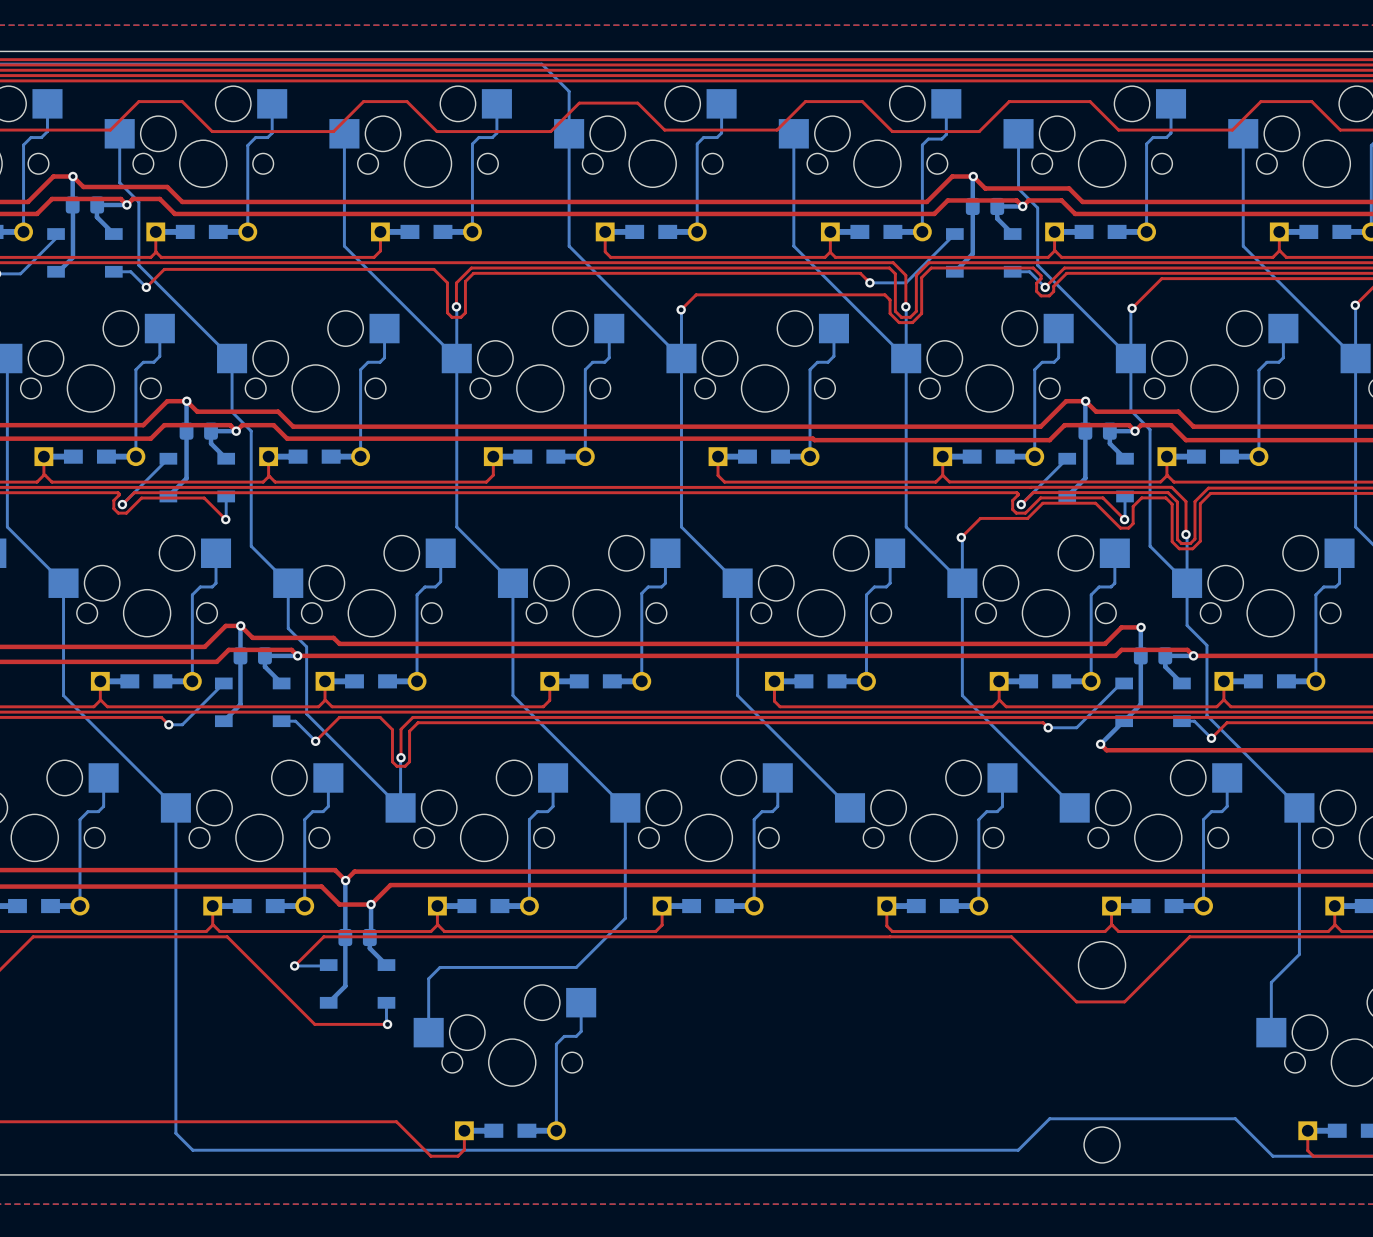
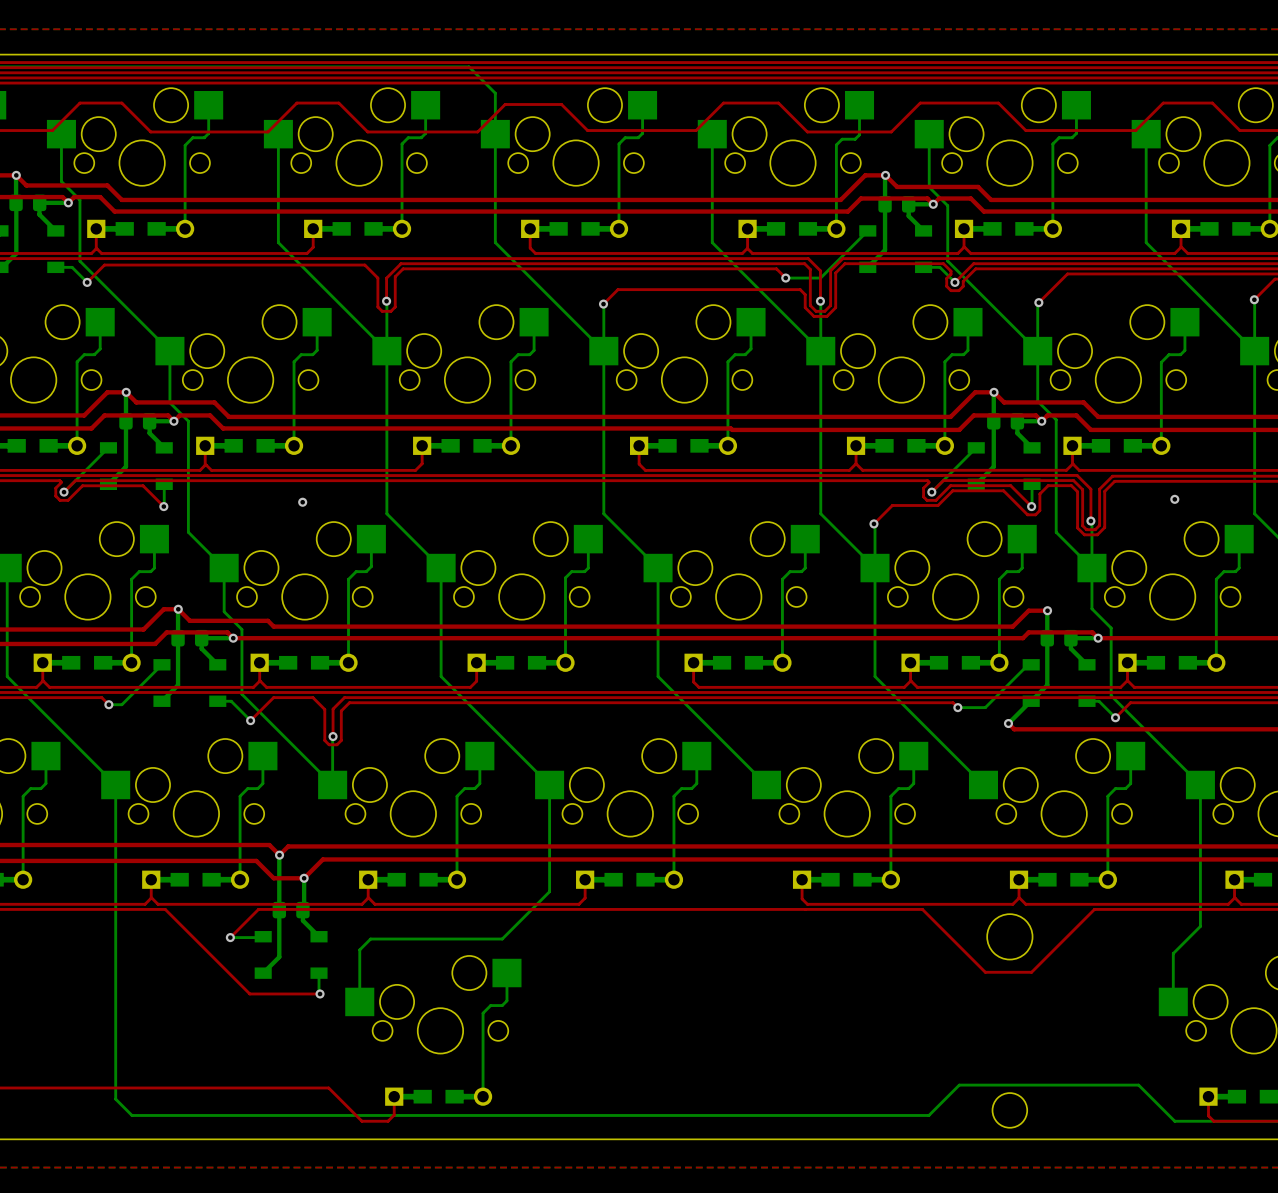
via: none -> (1174, 499)
via: none -> (302, 502)

